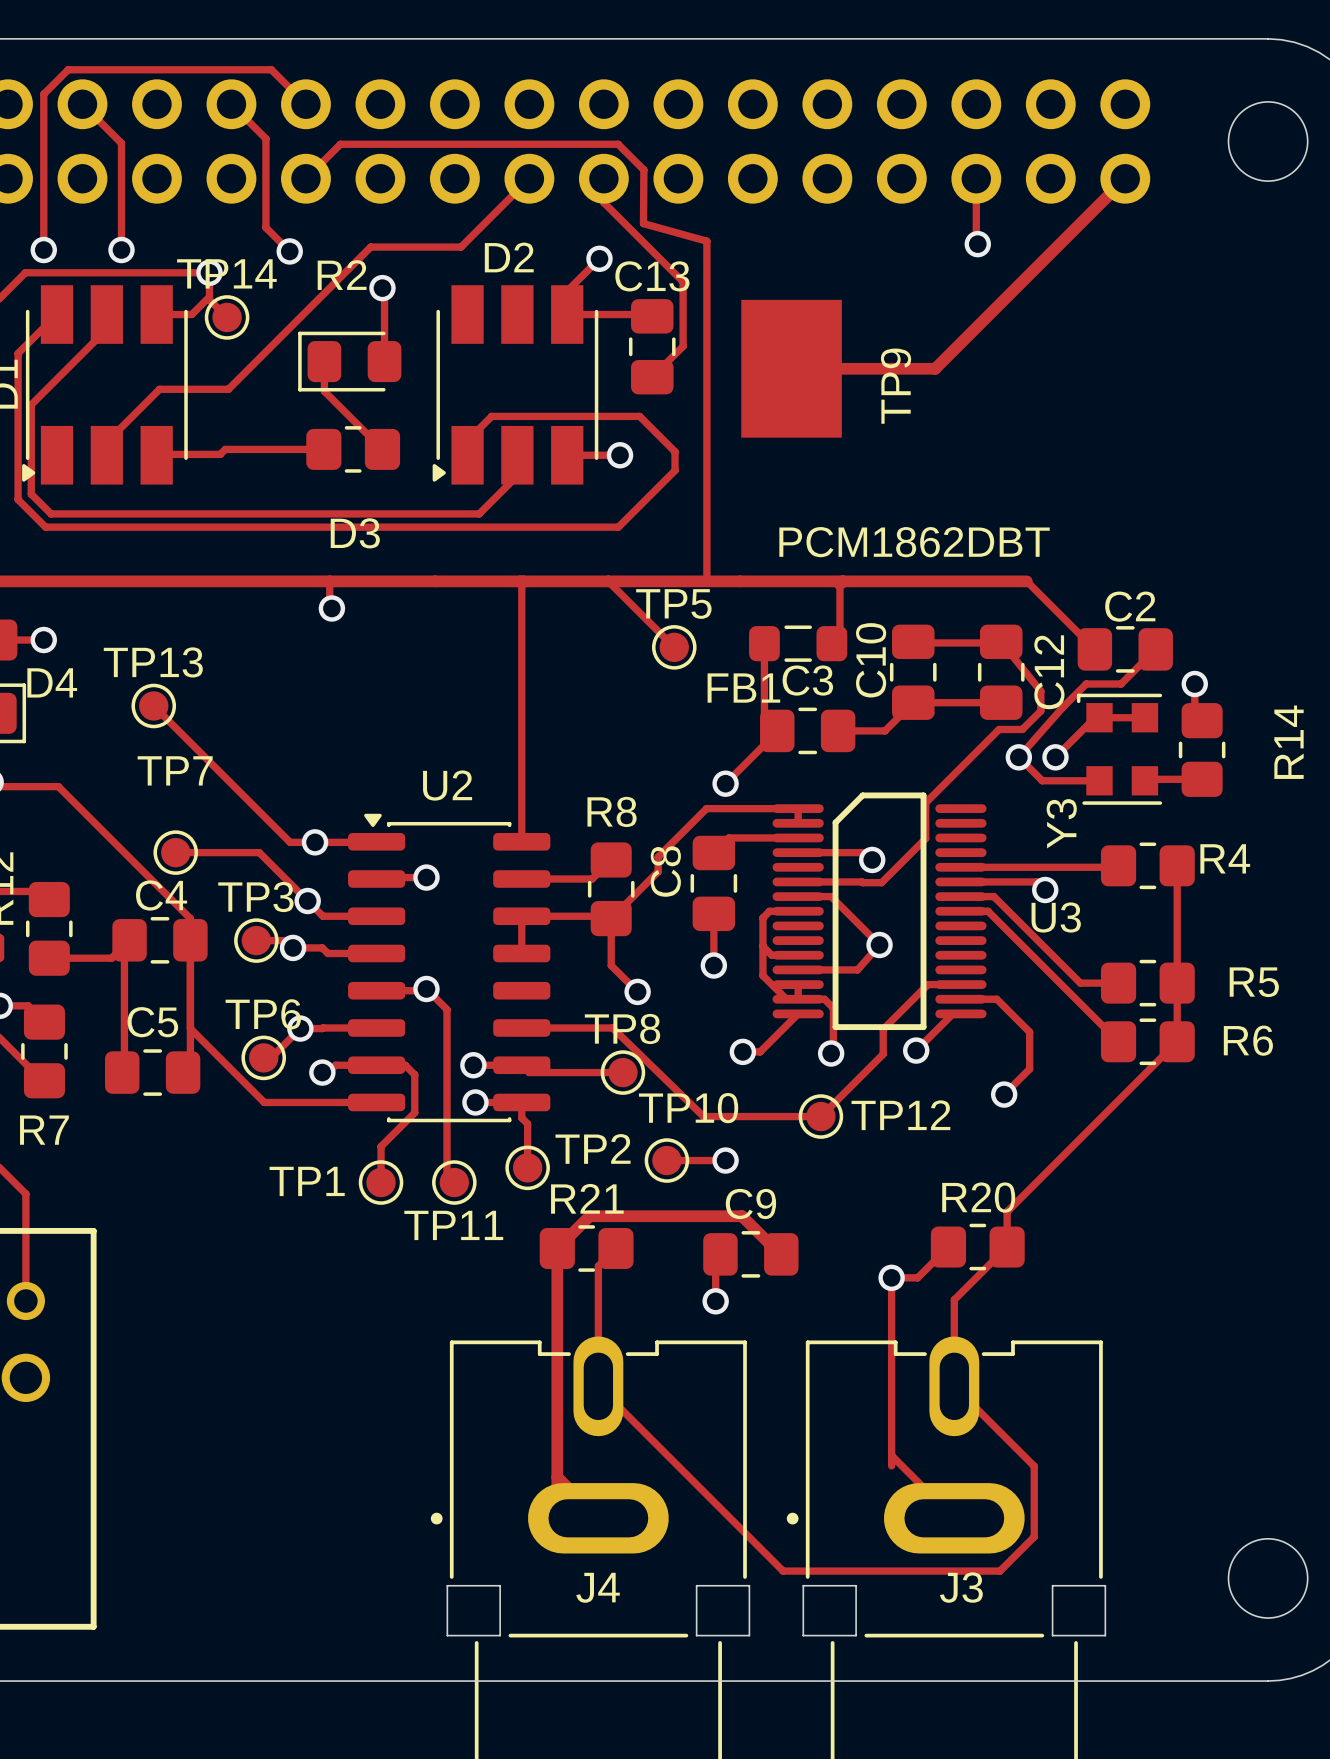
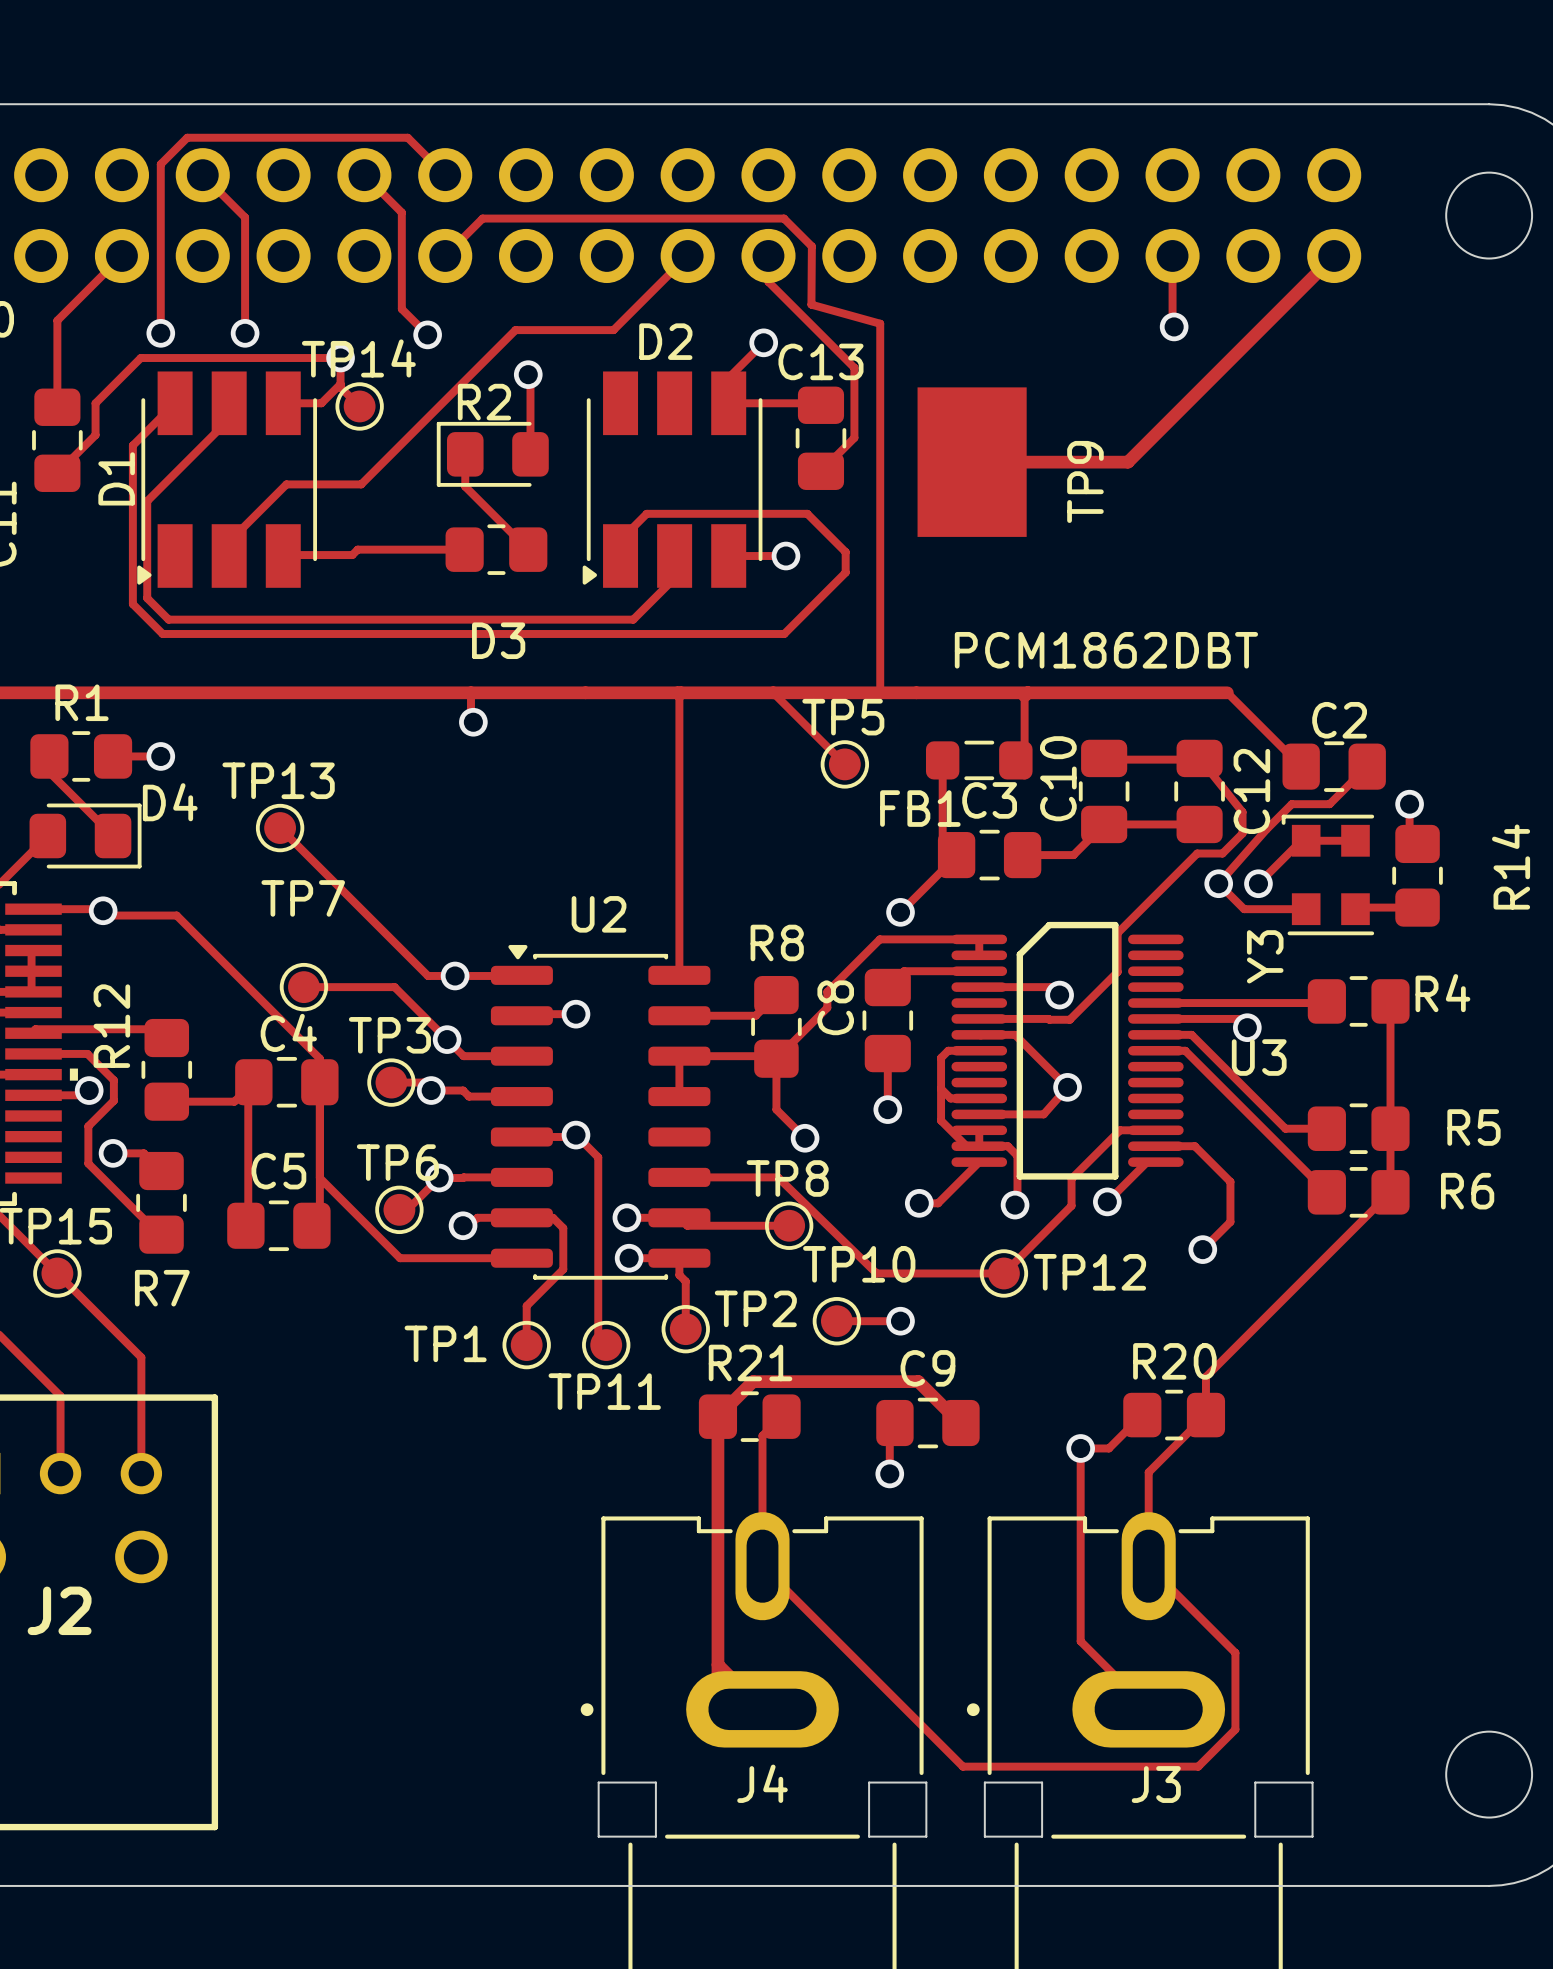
R2 name position: R2 (342, 275) -> R2 (484, 402)
track: (891, 1455) (891, 1465) -> none

